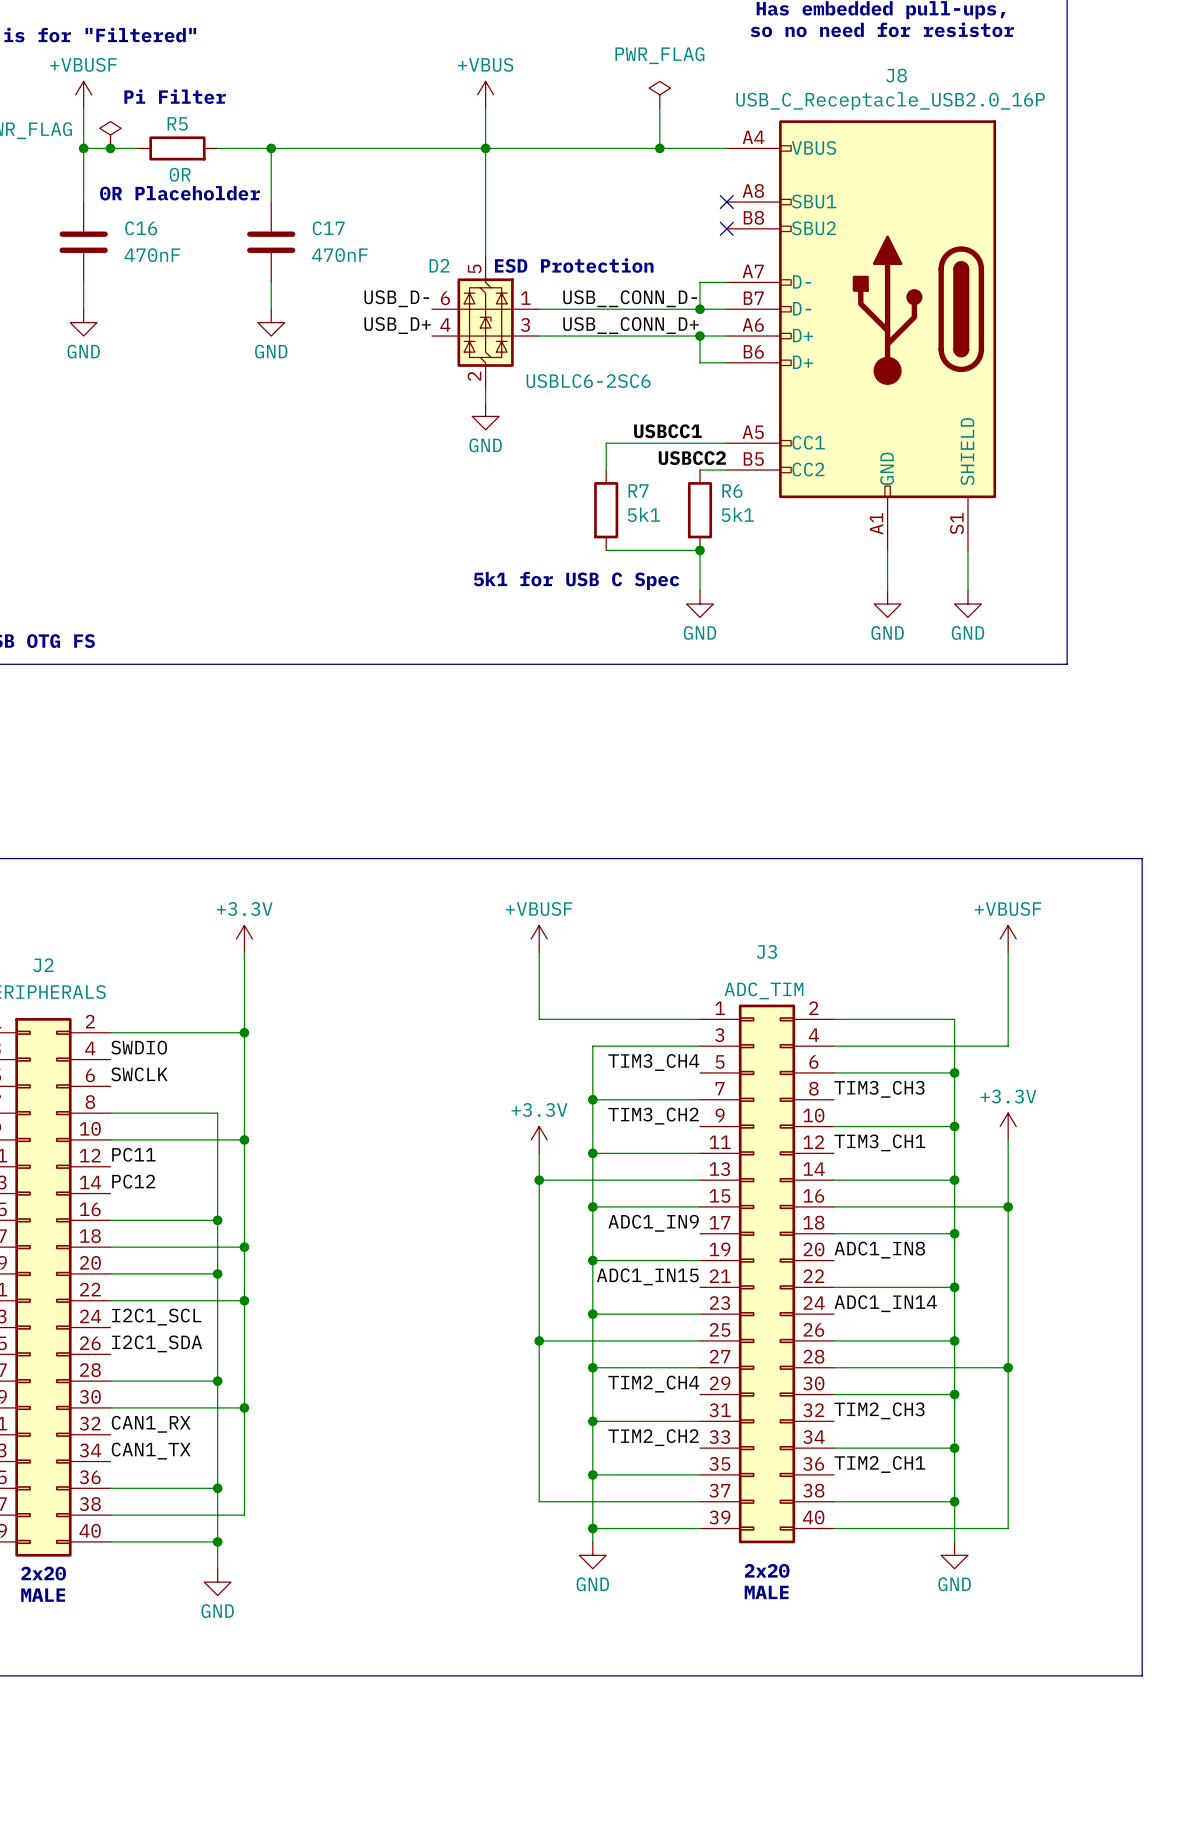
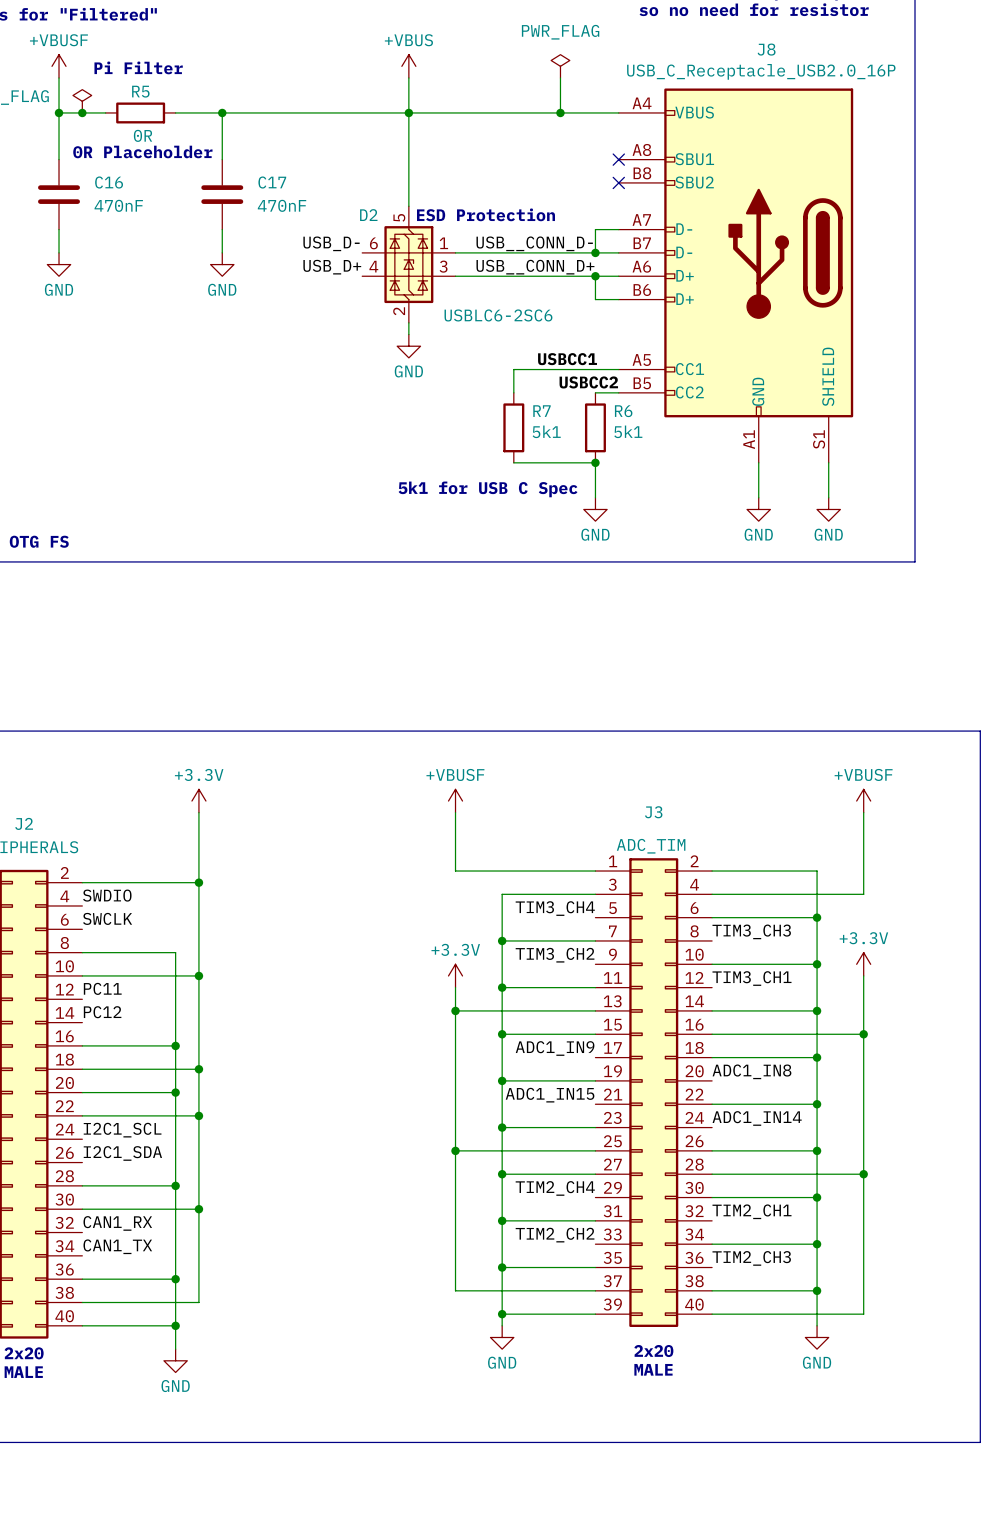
label: TIM2_CH3 (879, 1410) -> TIM2_CH1 (751, 1211)
label: TIM2_CH1 (879, 1464) -> TIM2_CH3 (751, 1258)

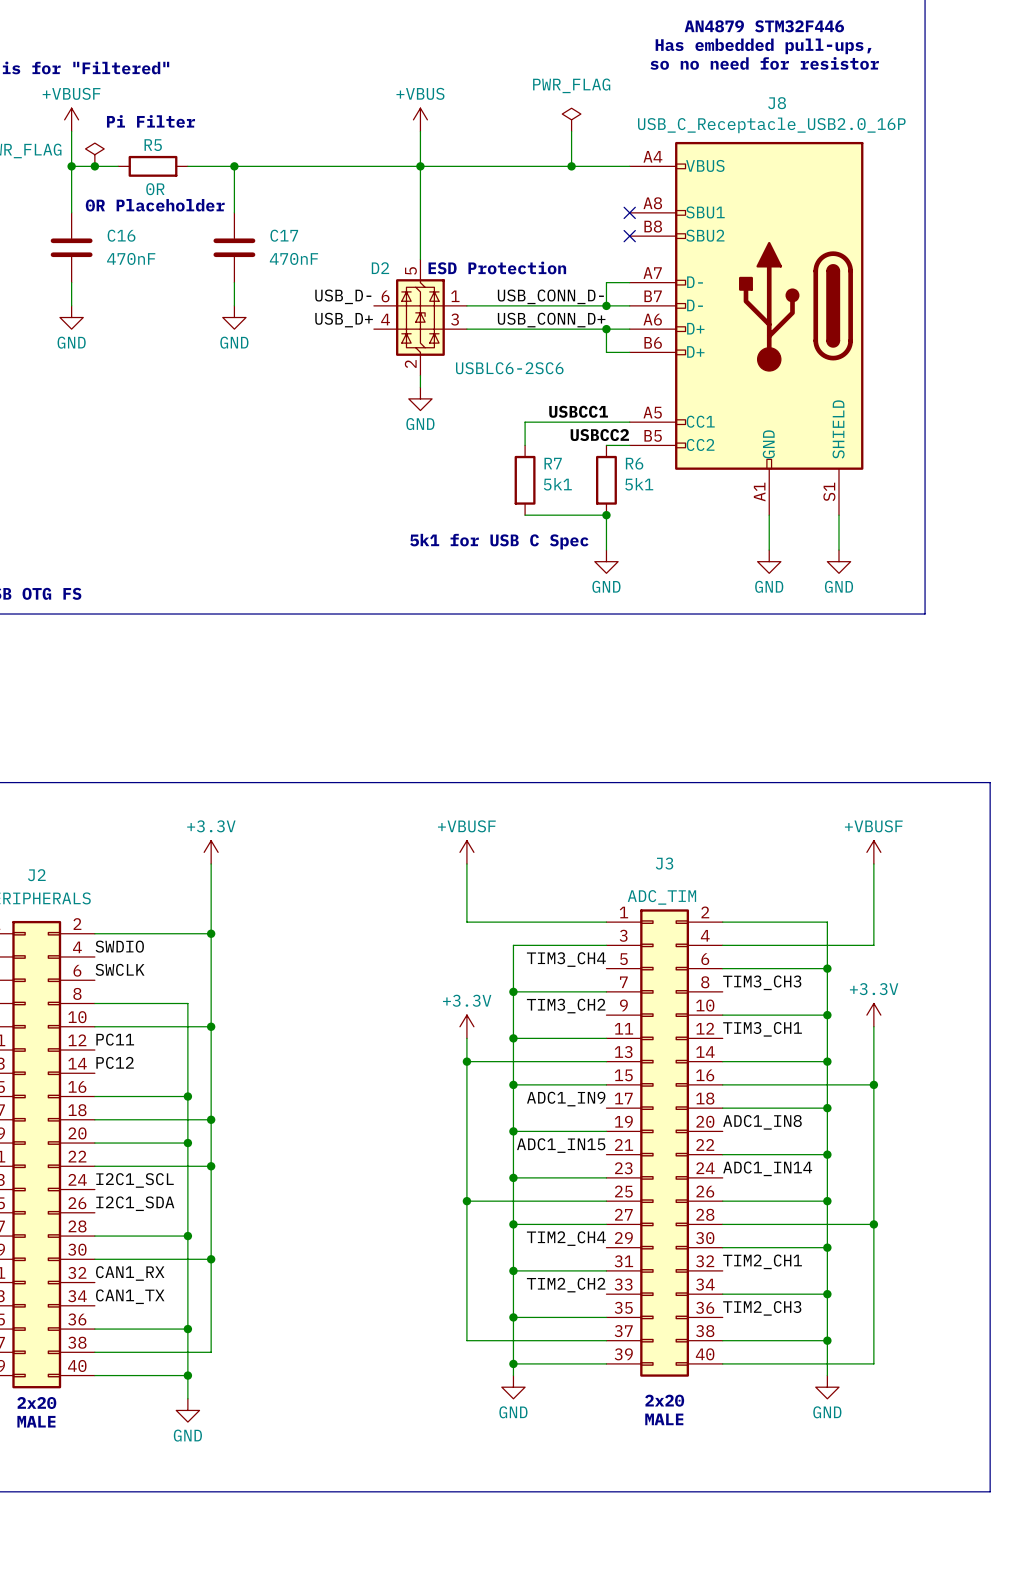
label: USB__CONN_D- (534, 243) -> USB_CONN_D- (550, 296)
label: USB__CONN_D+ (535, 267) -> USB_CONN_D+ (551, 320)

